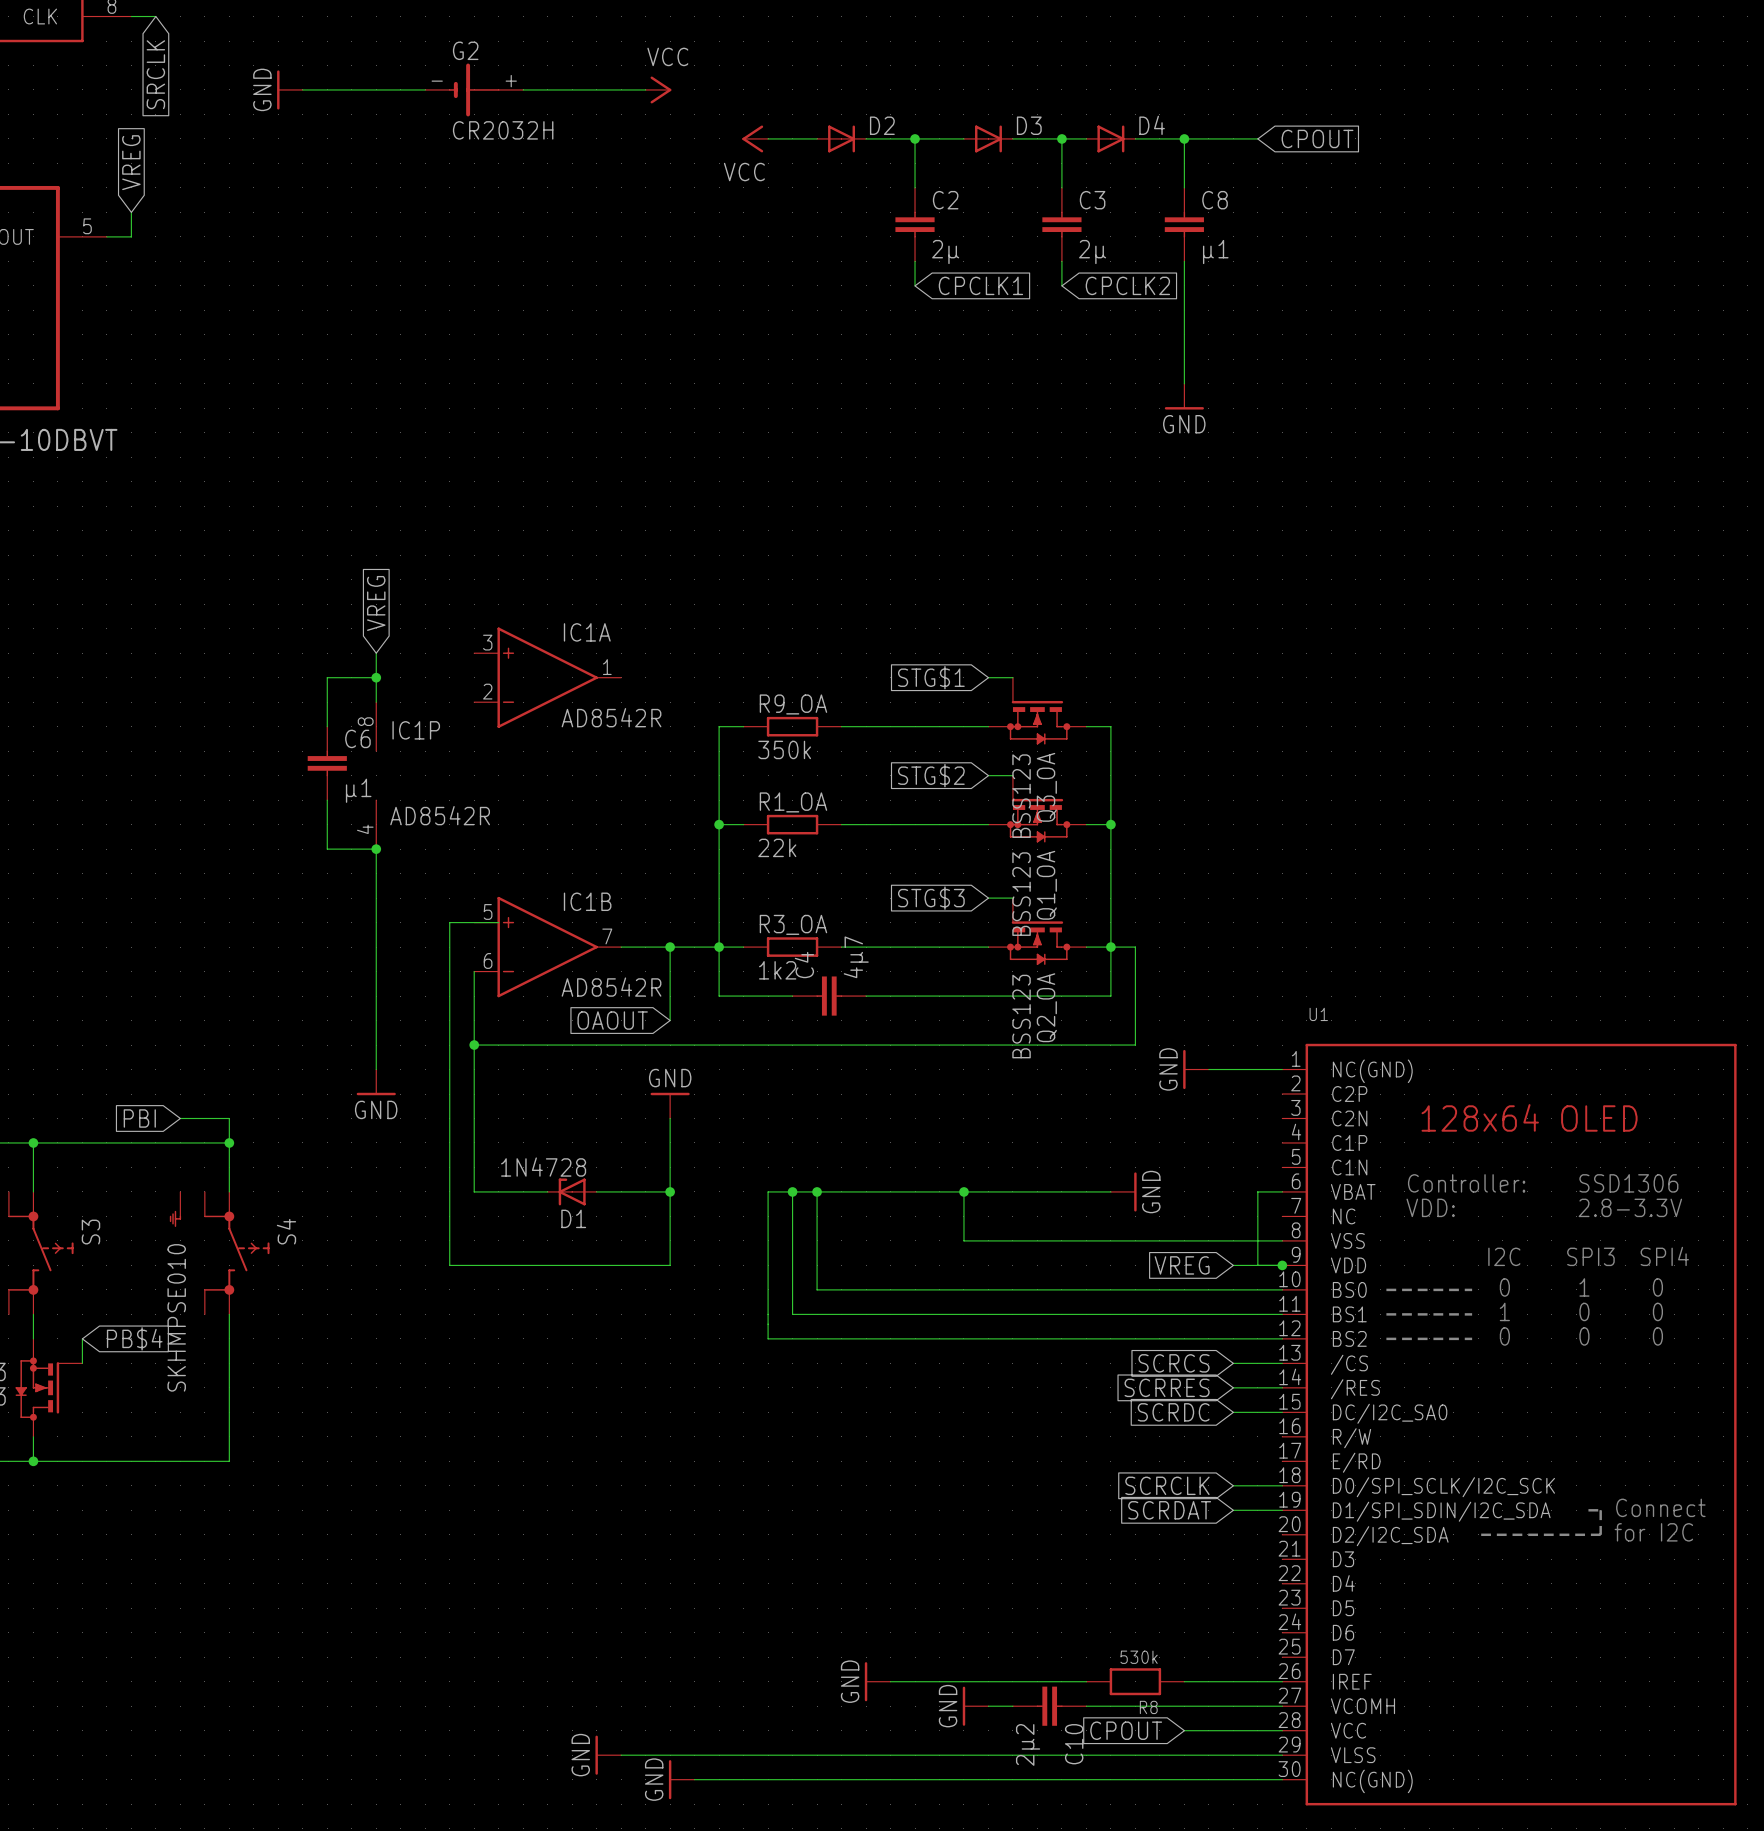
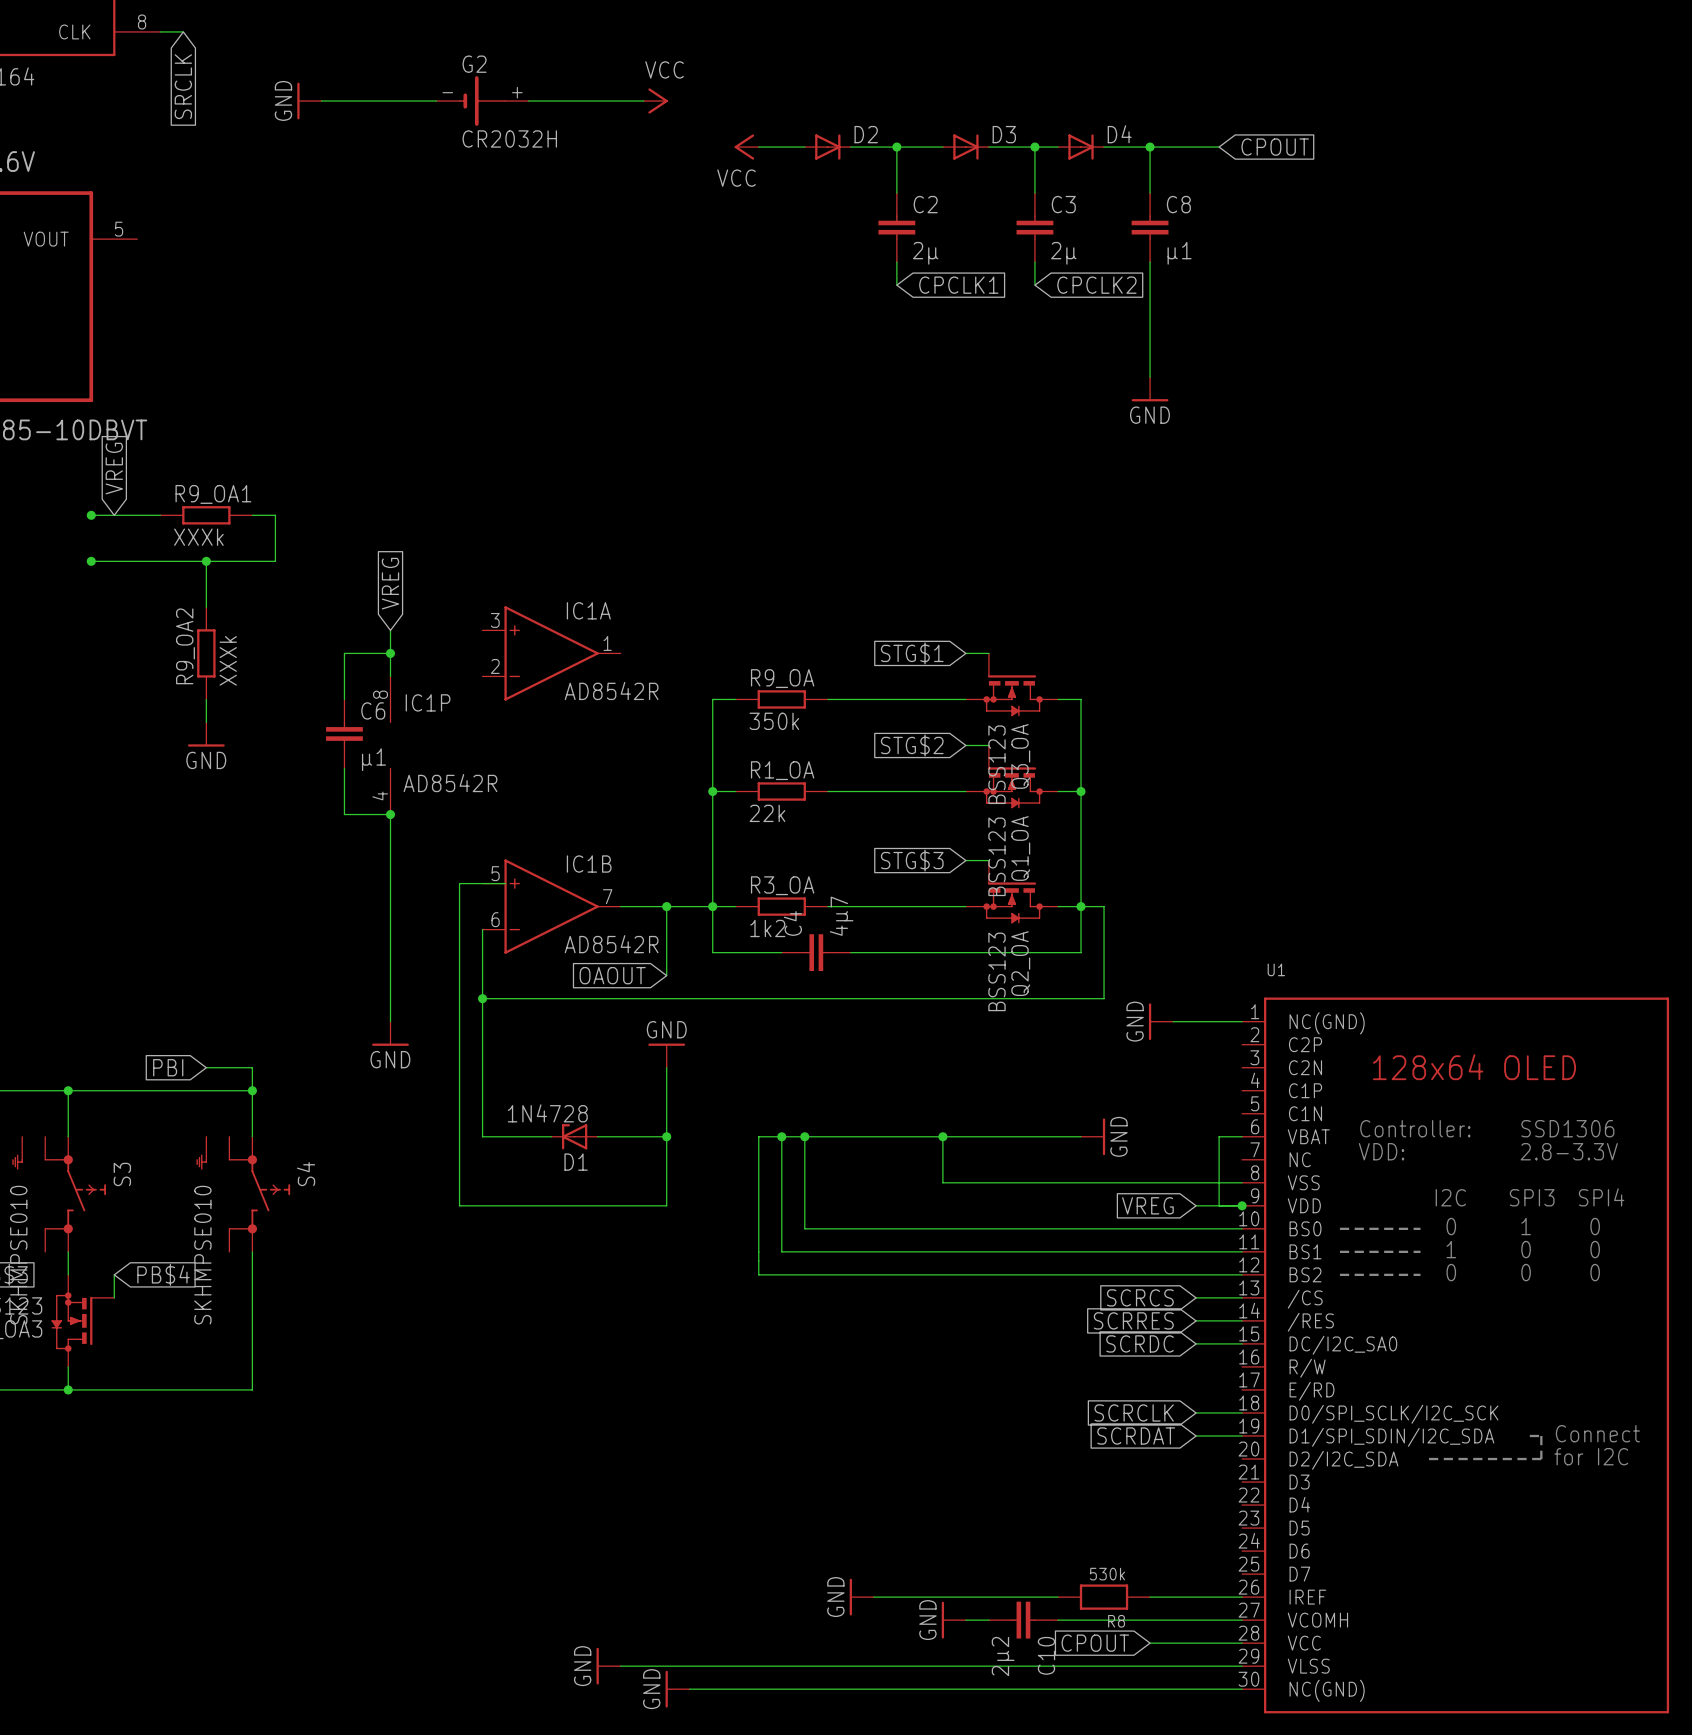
global label: VREG (131, 162) -> none
wire: (131, 212) (131, 236) (106, 236) -> none
global label: none -> VREG (114, 468)
wire: none -> (91, 515) (160, 515)
junction: none -> (91, 515)
R9_OA1: none -> XXXk (206, 515)
wire: none -> (252, 515) (275, 515) (275, 561) (91, 561)
junction: none -> (91, 561)
wire: none -> (206, 561) (206, 607)
junction: none -> (206, 561)
R9_OA2: none -> XXXk (206, 653)
wire: none -> (206, 699) (206, 722)
power symbol: none -> GND (206, 734)

